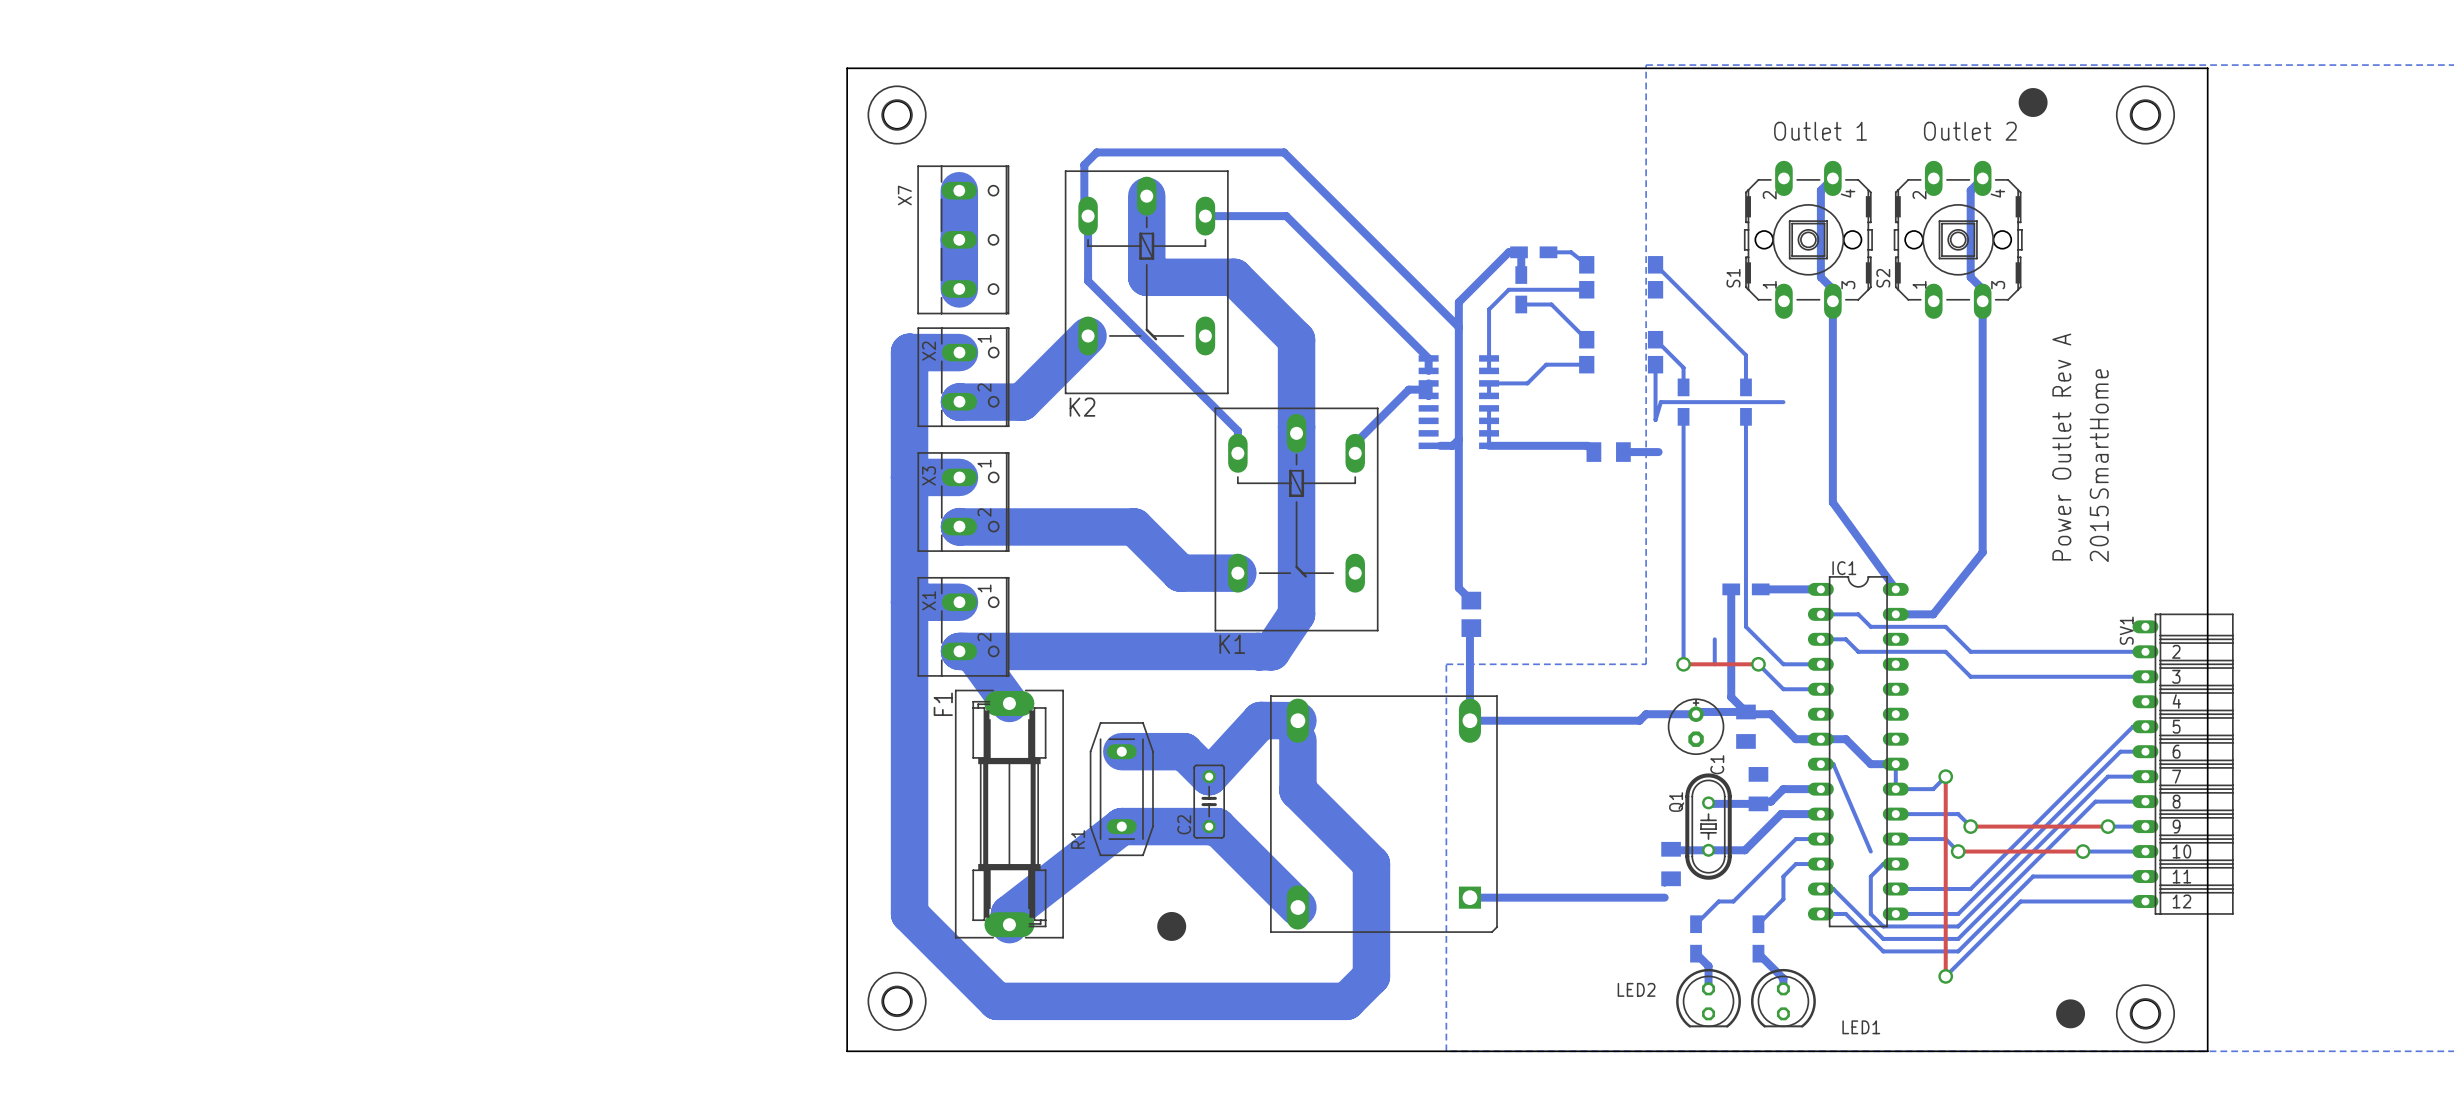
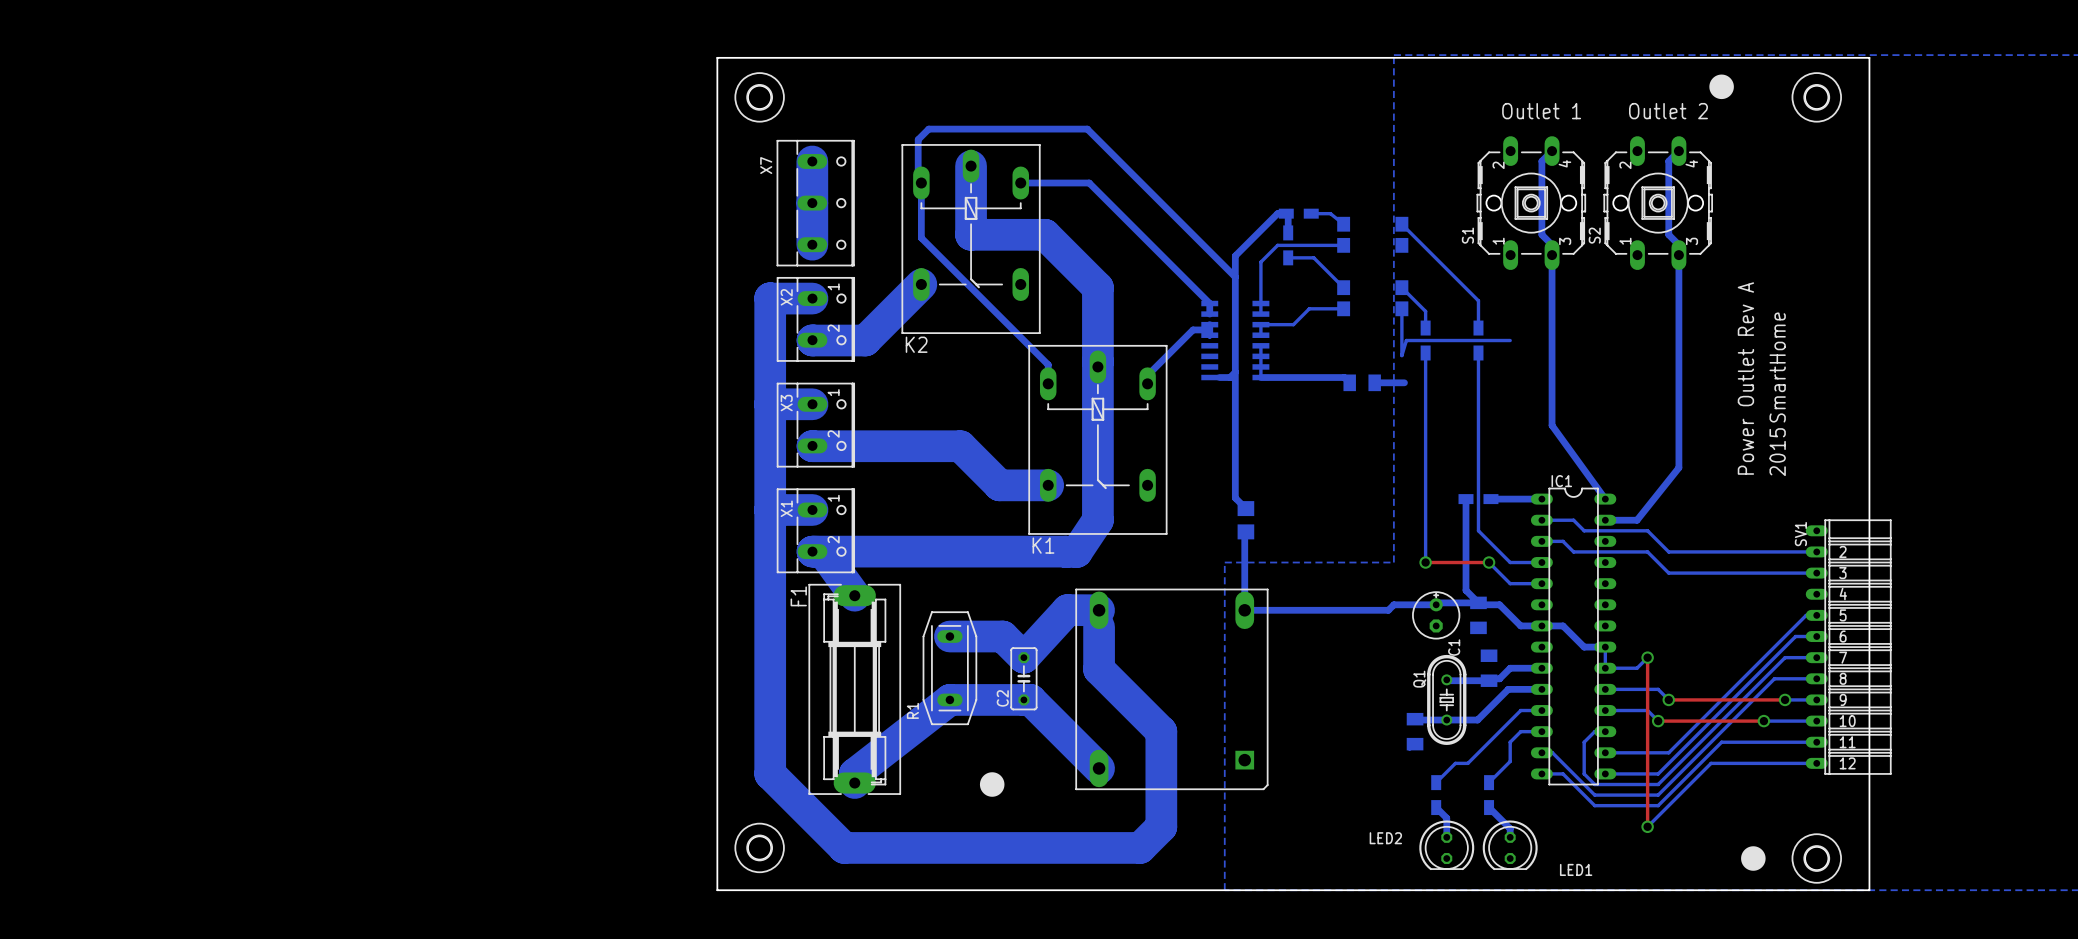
bottom track: (1714, 639) (1714, 664) -> none
bottom track: (1820, 764) (1833, 764) (1870, 851) -> none
bottom track: (1469, 897) (1664, 897) -> none

